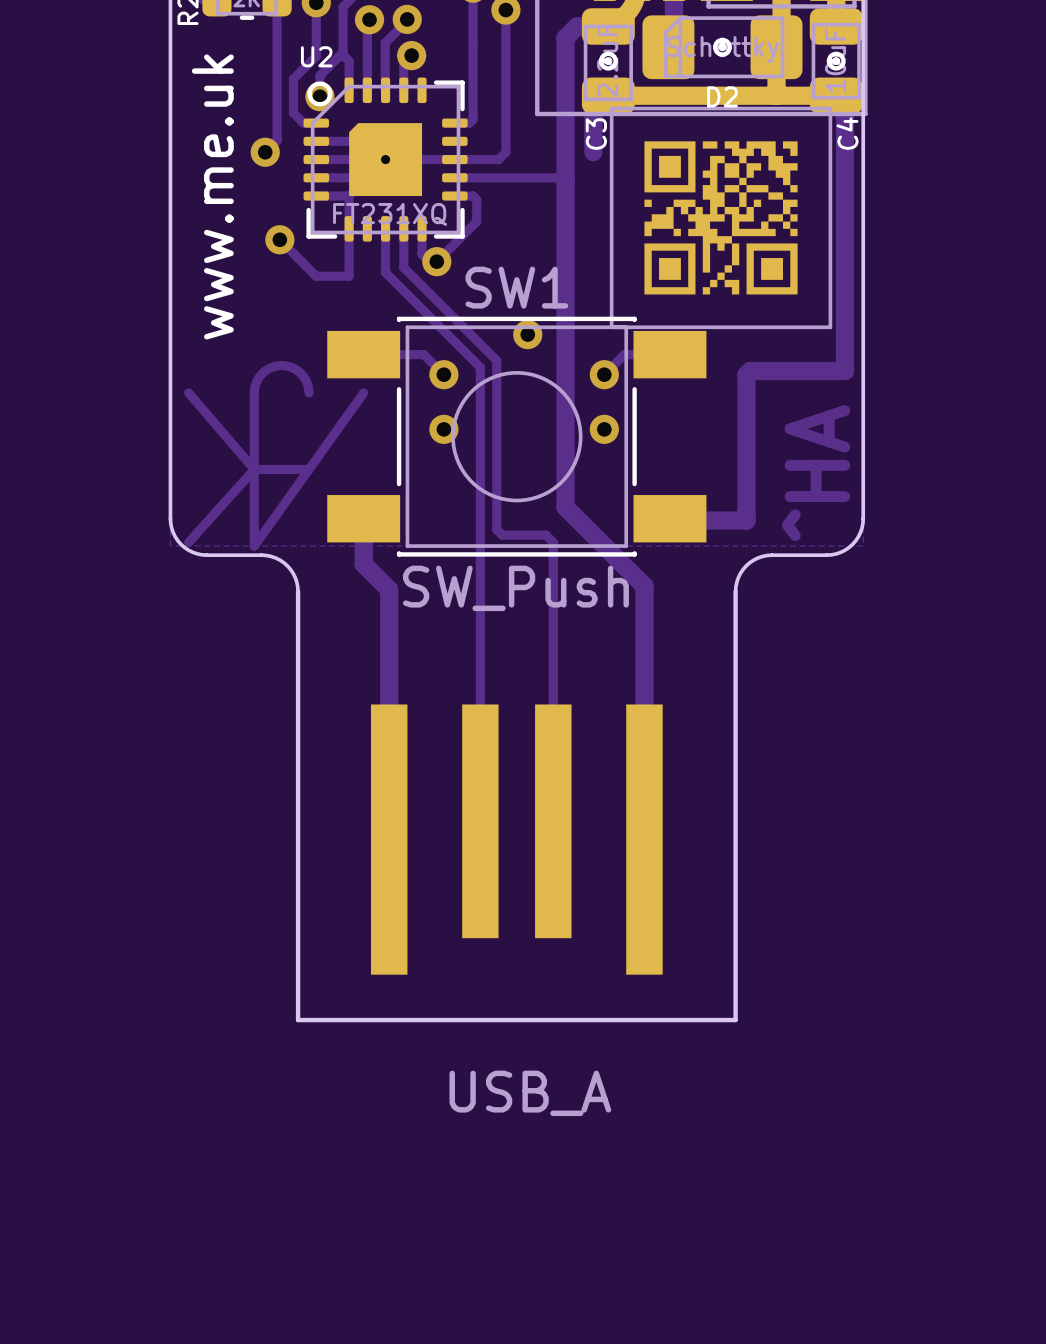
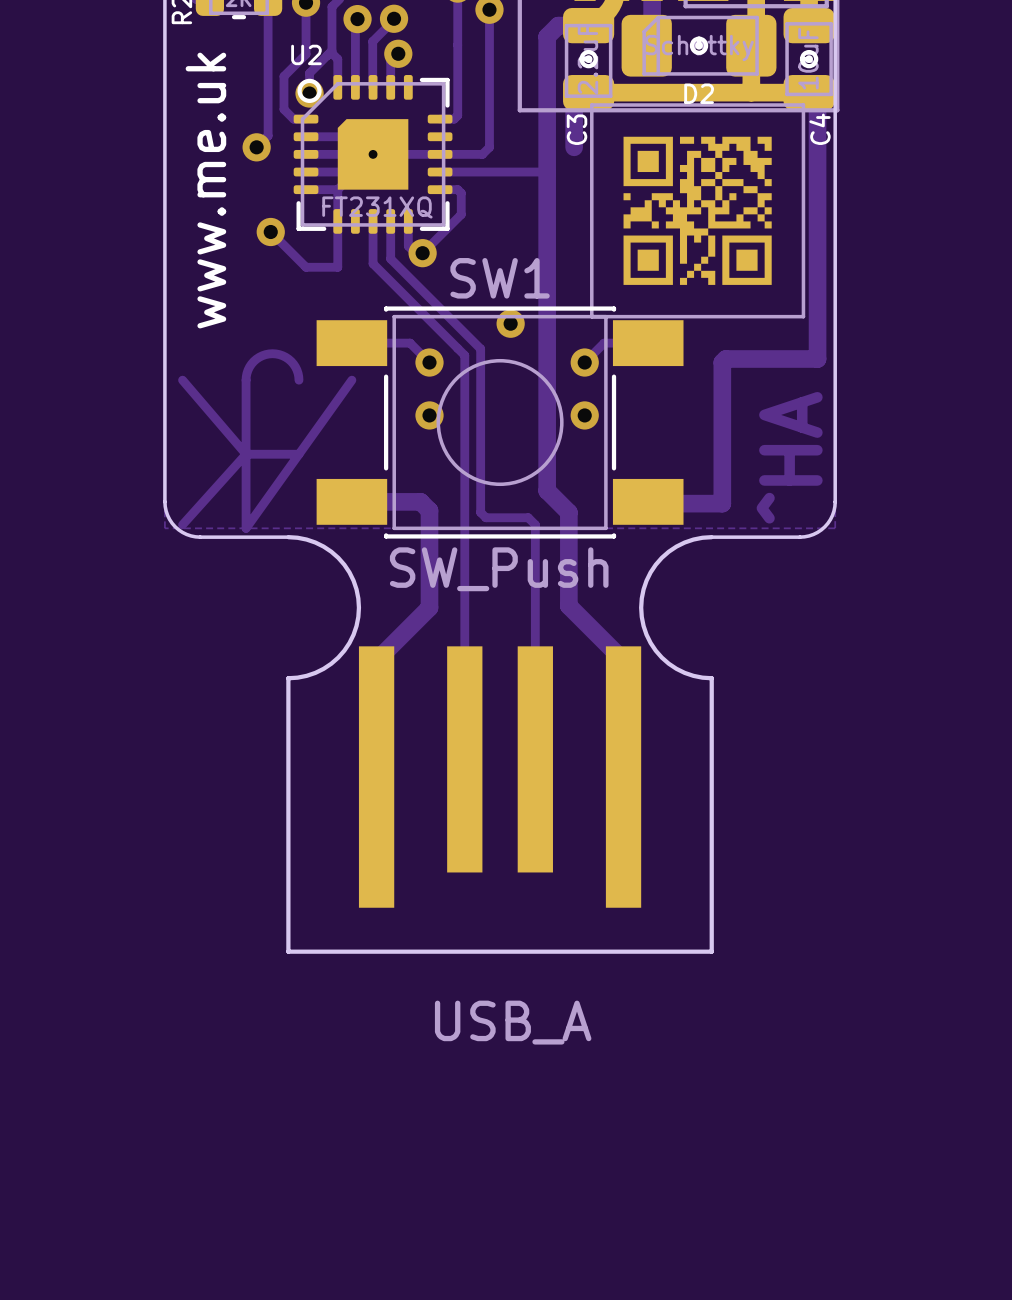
track: (363, 518) (363, 564) (389, 589) (389, 682) -> (351, 501) (420, 501) (429, 510) (429, 607) (376, 660)
track: (587, 529) (644, 586) (644, 682) -> (568, 512) (568, 605) (623, 660)
board edge: (261, 555) (275, 557) (287, 565) (295, 577) (298, 591) -> (253, 537) (288, 537)
board edge: (772, 555) (758, 557) (746, 565) (738, 577) (735, 591) -> (747, 537) (711, 537)
part footprint: [295, 589, 738, 1023] -> [286, 535, 714, 954]

